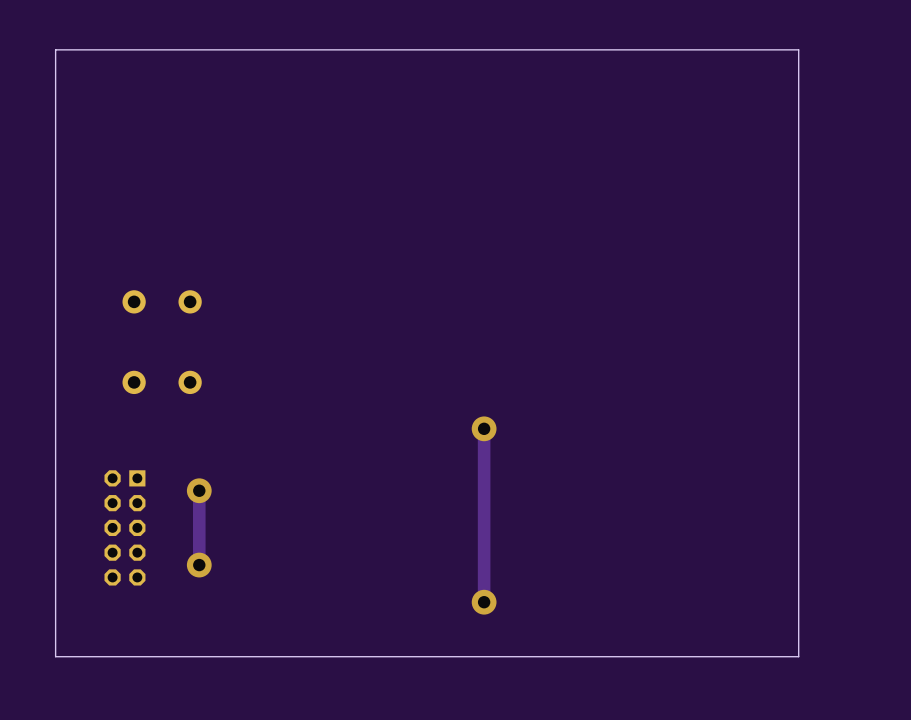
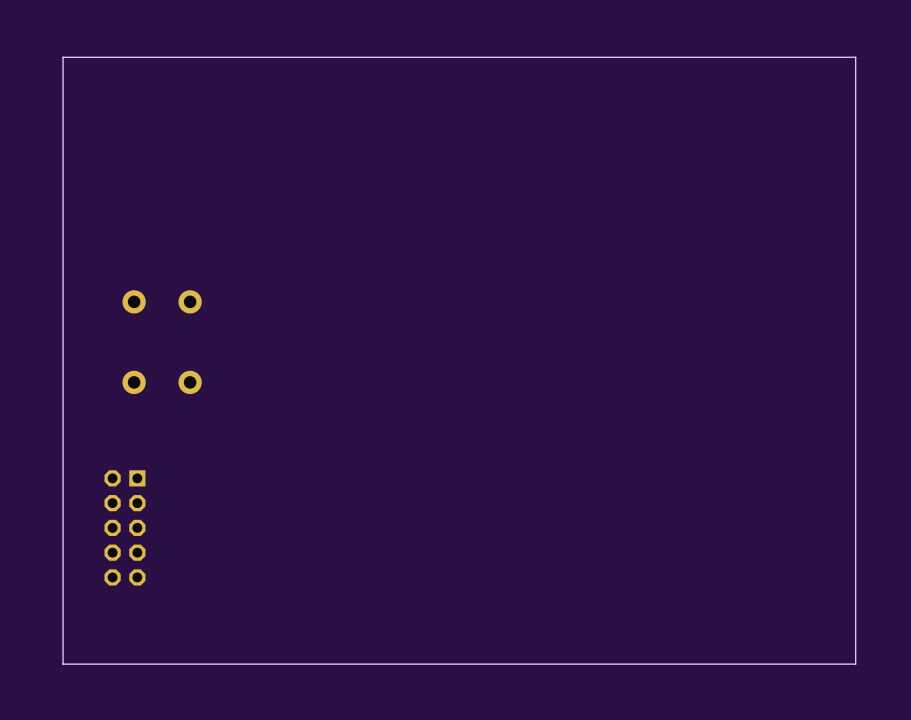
board edge: (798, 49) (55, 49) (55, 656) (798, 656) (798, 49) -> (855, 57) (855, 664) (63, 664) (63, 57) (855, 57)
track: (484, 428) (484, 602) -> none
via: (484, 428) -> none
track: (199, 490) (199, 565) -> none
via: (199, 490) -> none
via: (199, 565) -> none
via: (484, 602) -> none

